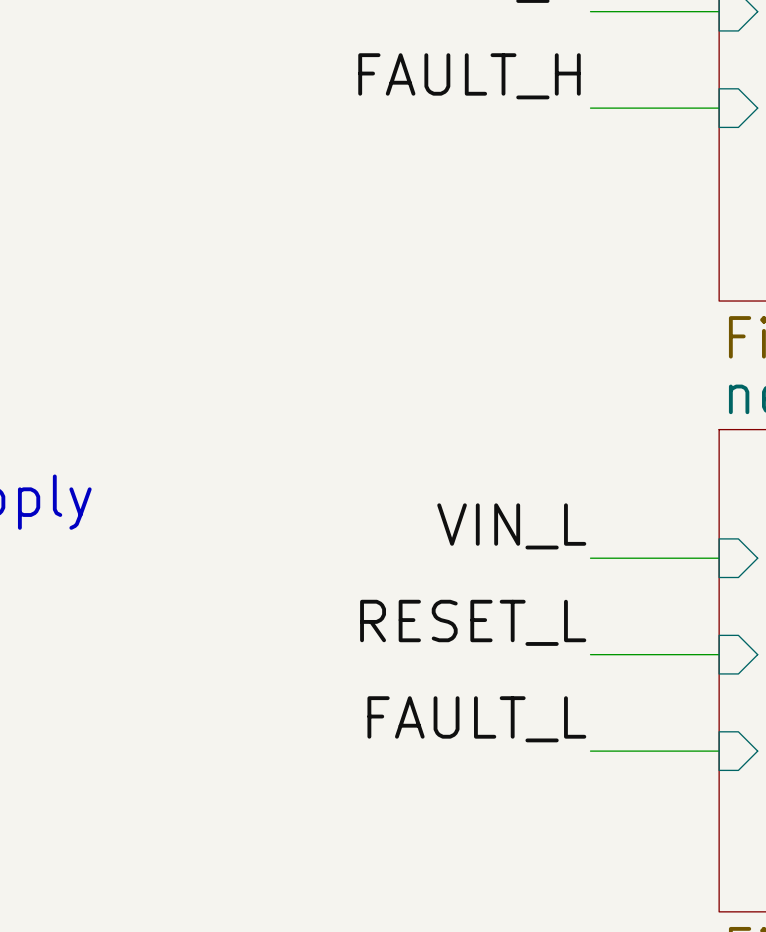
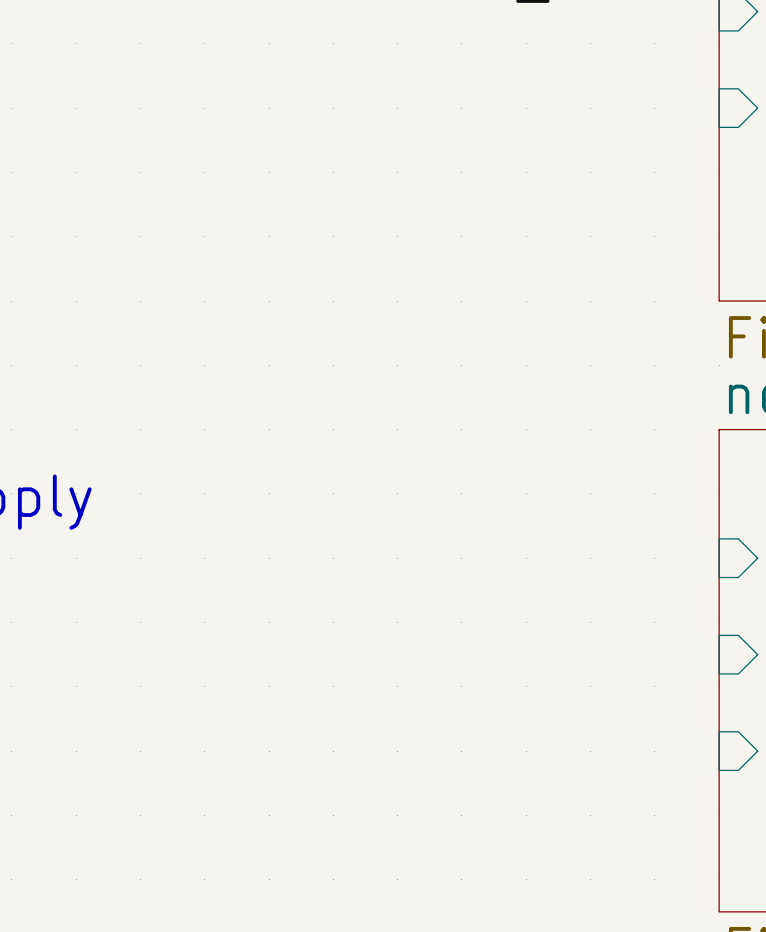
wire: (590, 11) (719, 11) -> none
label: FAULT_H (469, 76) -> none
wire: (590, 108) (719, 108) -> none
label: VIN_L (511, 526) -> none
wire: (590, 558) (719, 558) -> none
label: RESET_L (473, 622) -> none
wire: (590, 654) (719, 654) -> none
label: FAULT_L (476, 719) -> none
wire: (590, 751) (719, 751) -> none

